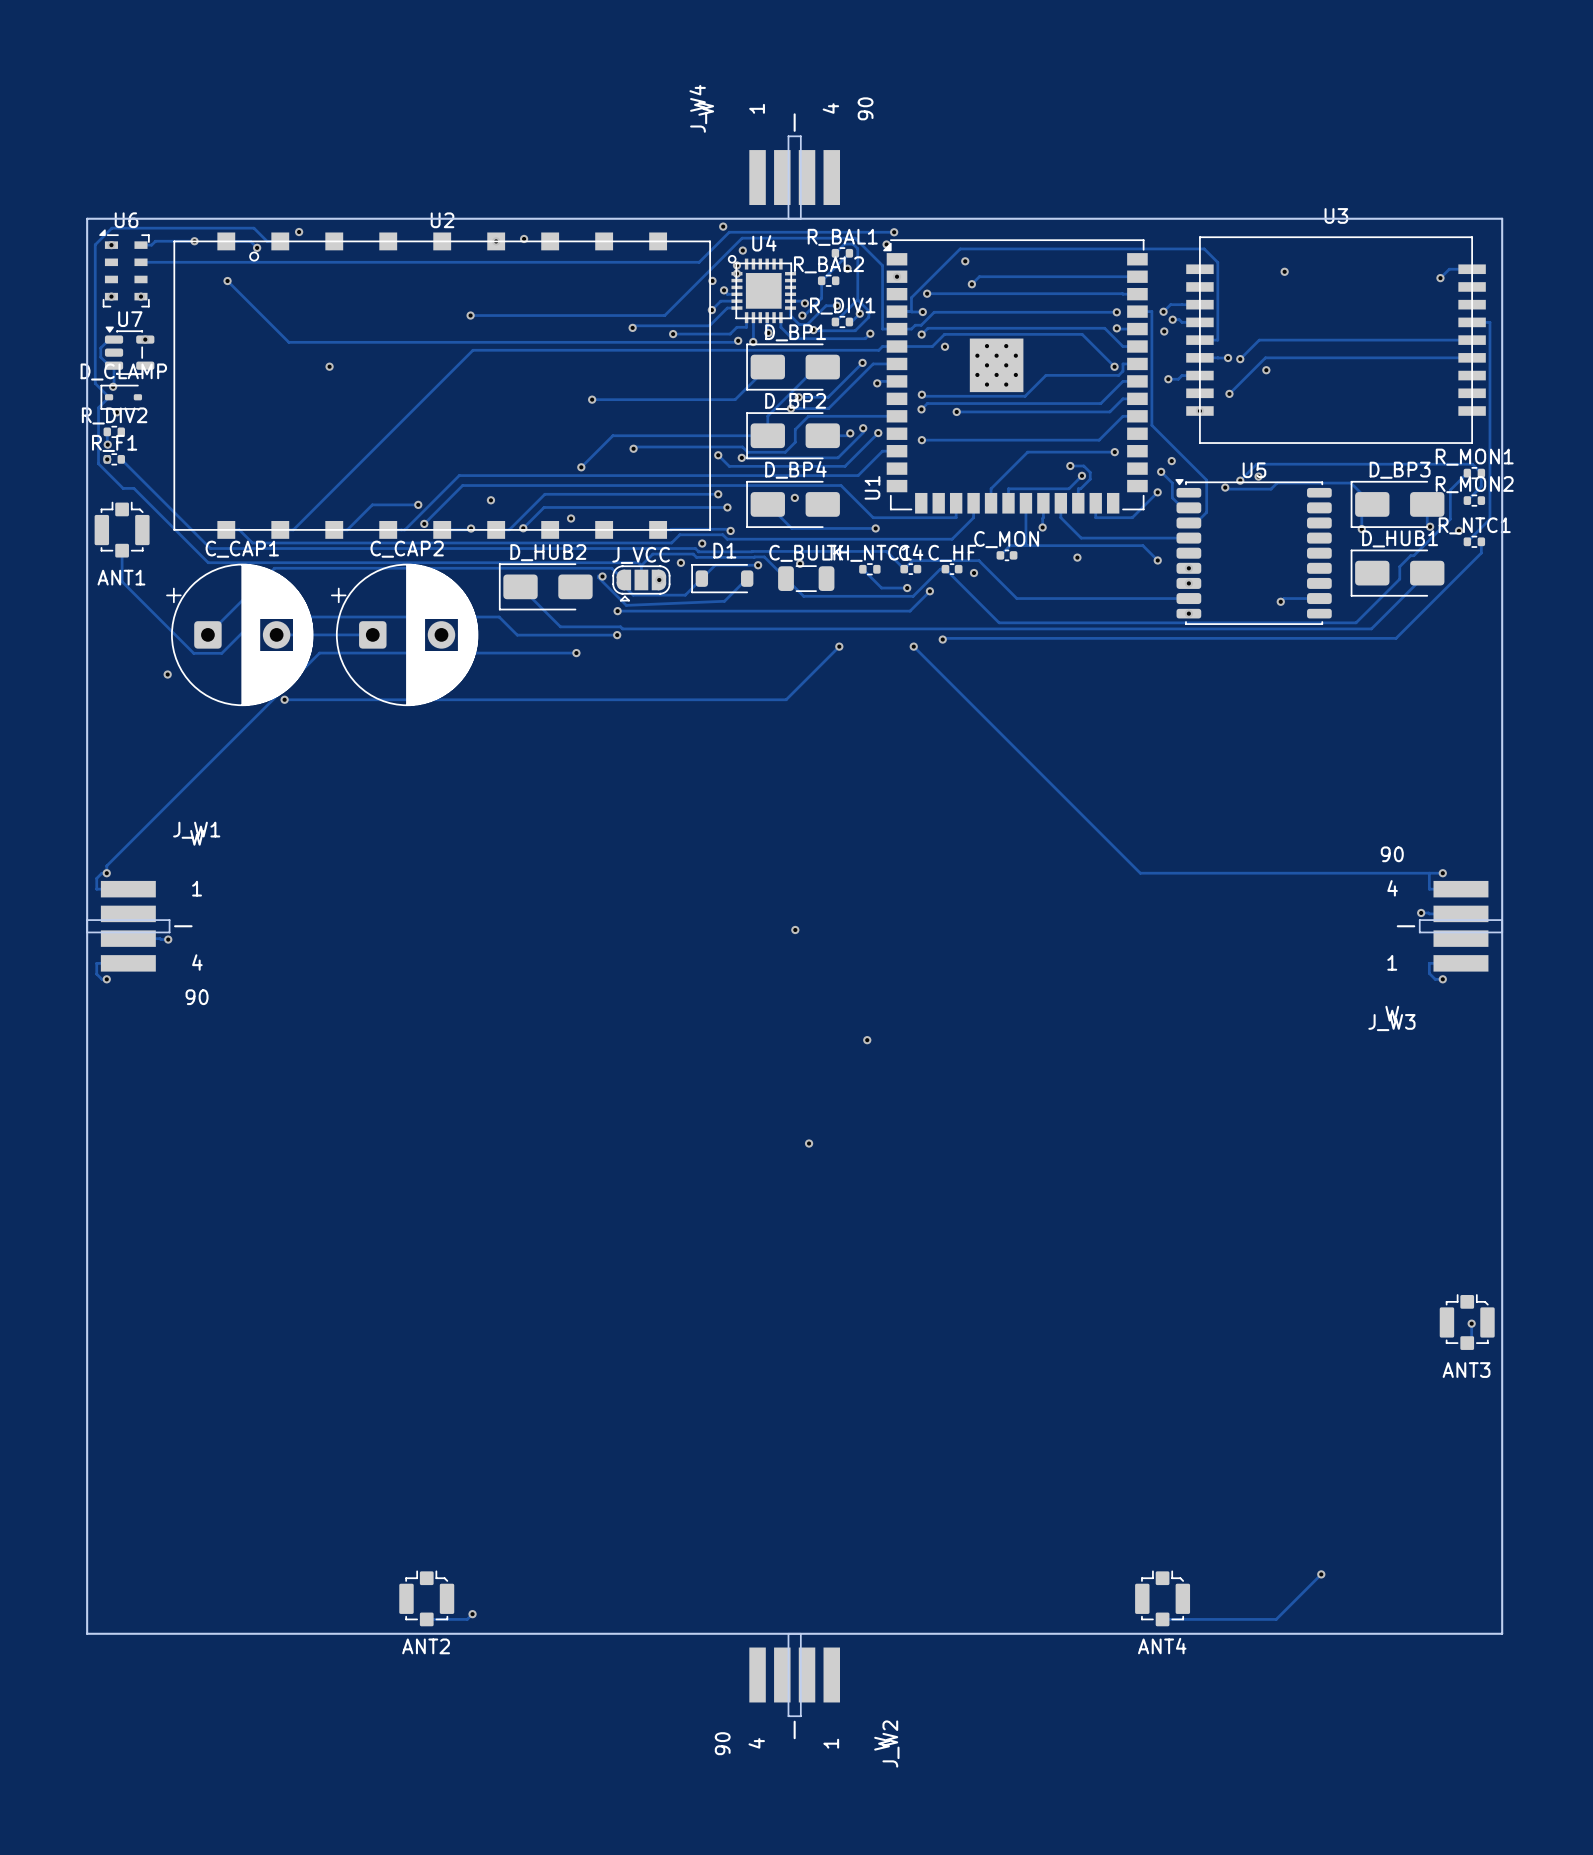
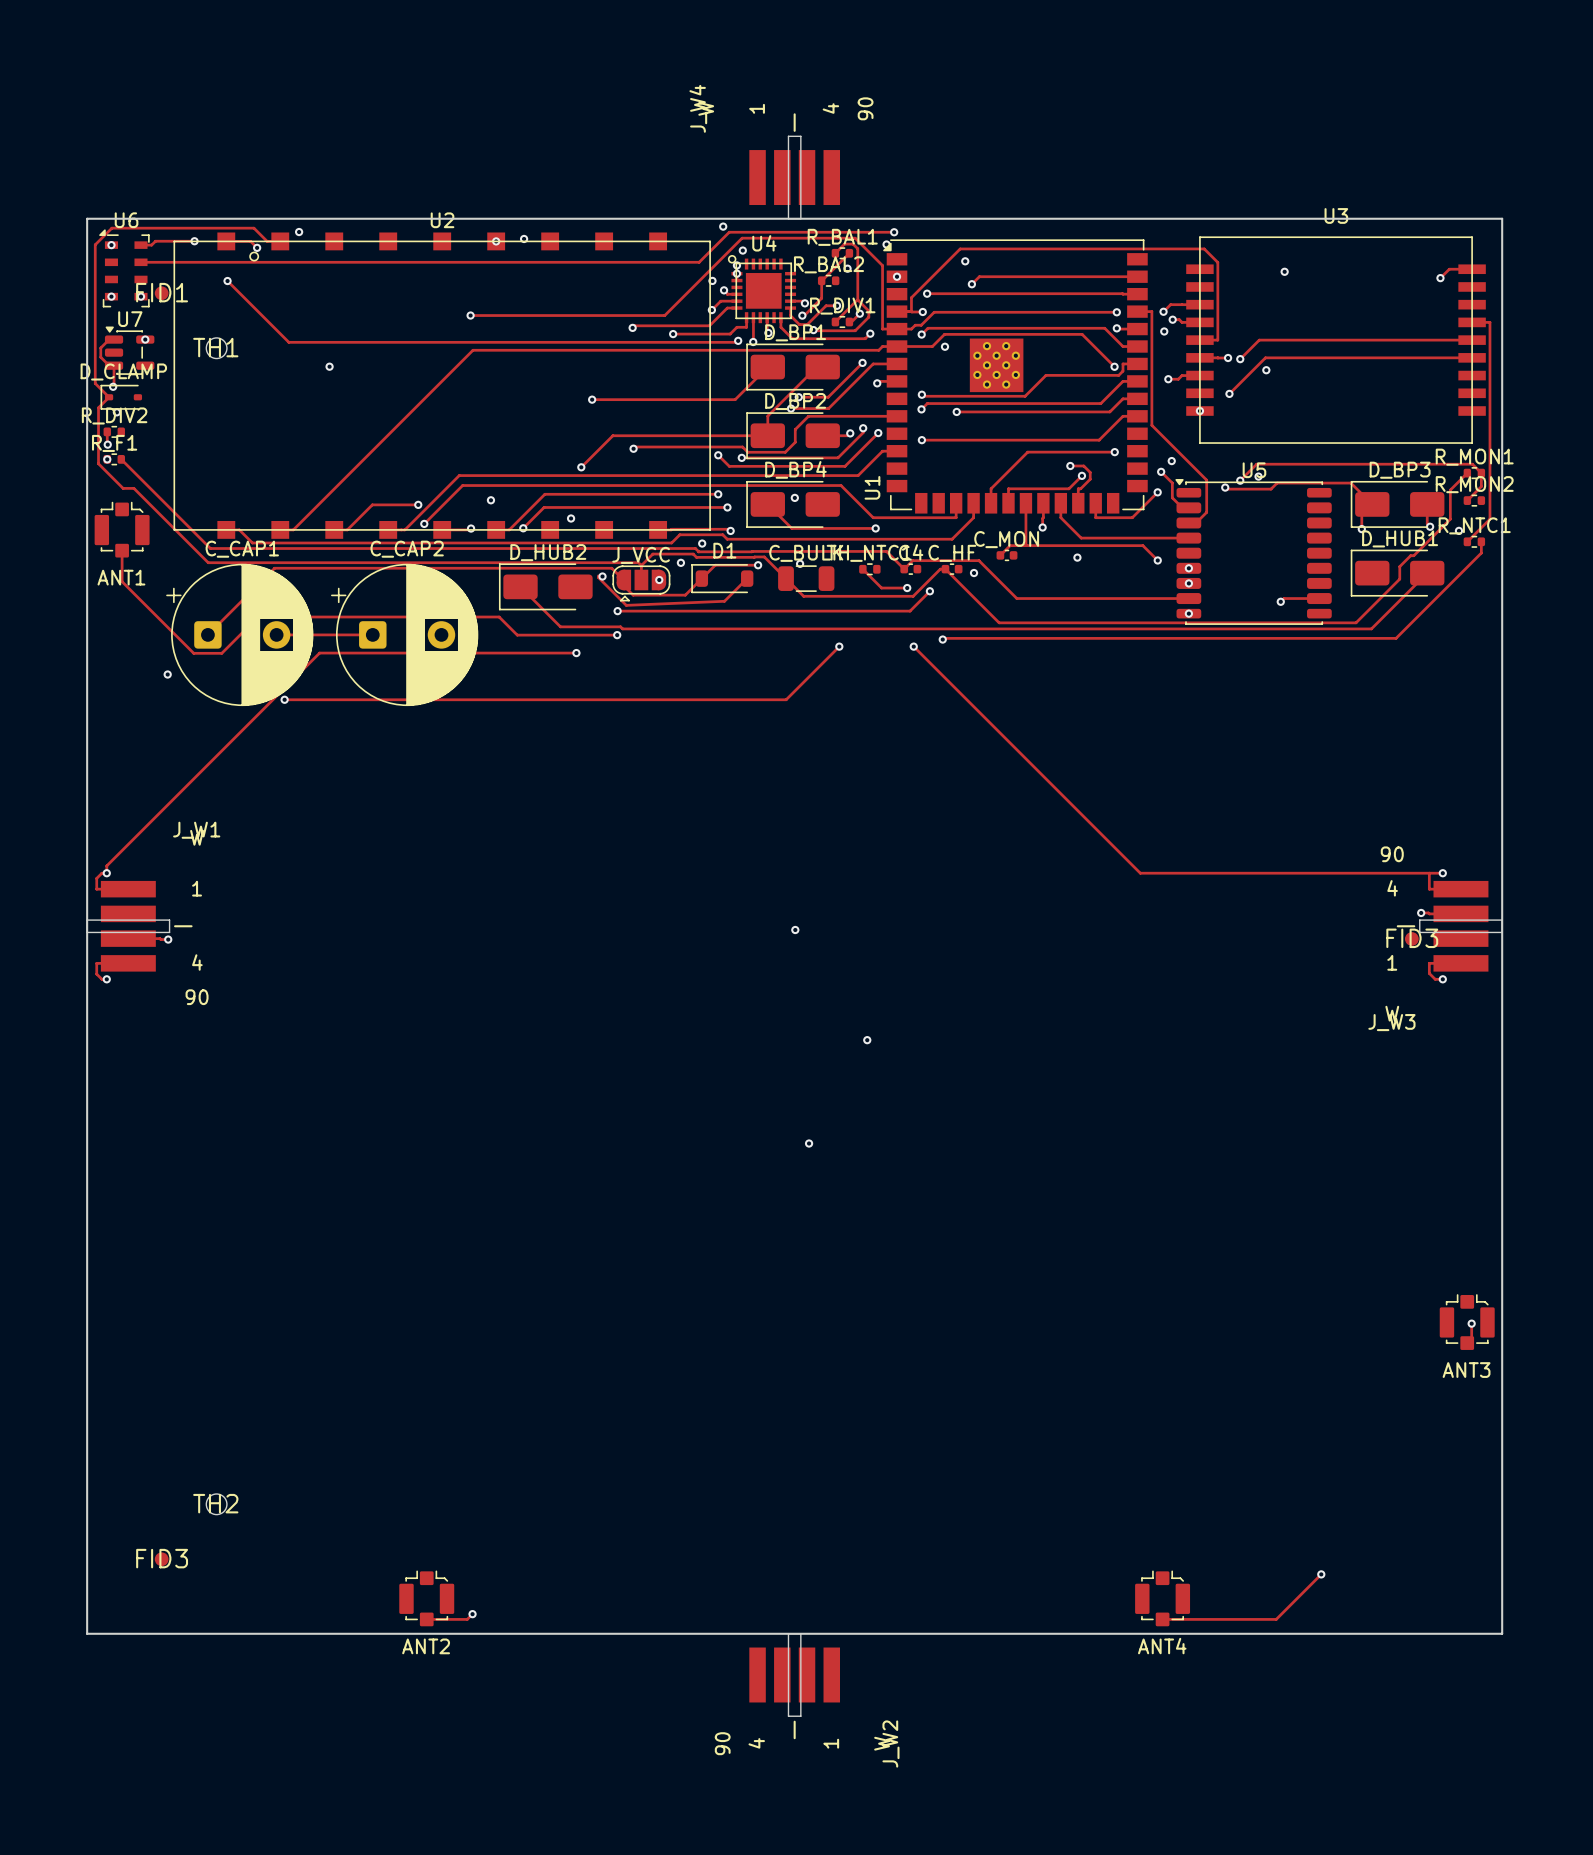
FID1: none -> (161, 293)
TH1: none -> (216, 348)
FID3: none -> (1411, 938)
TH2: none -> (216, 1504)
FID3: none -> (161, 1559)

